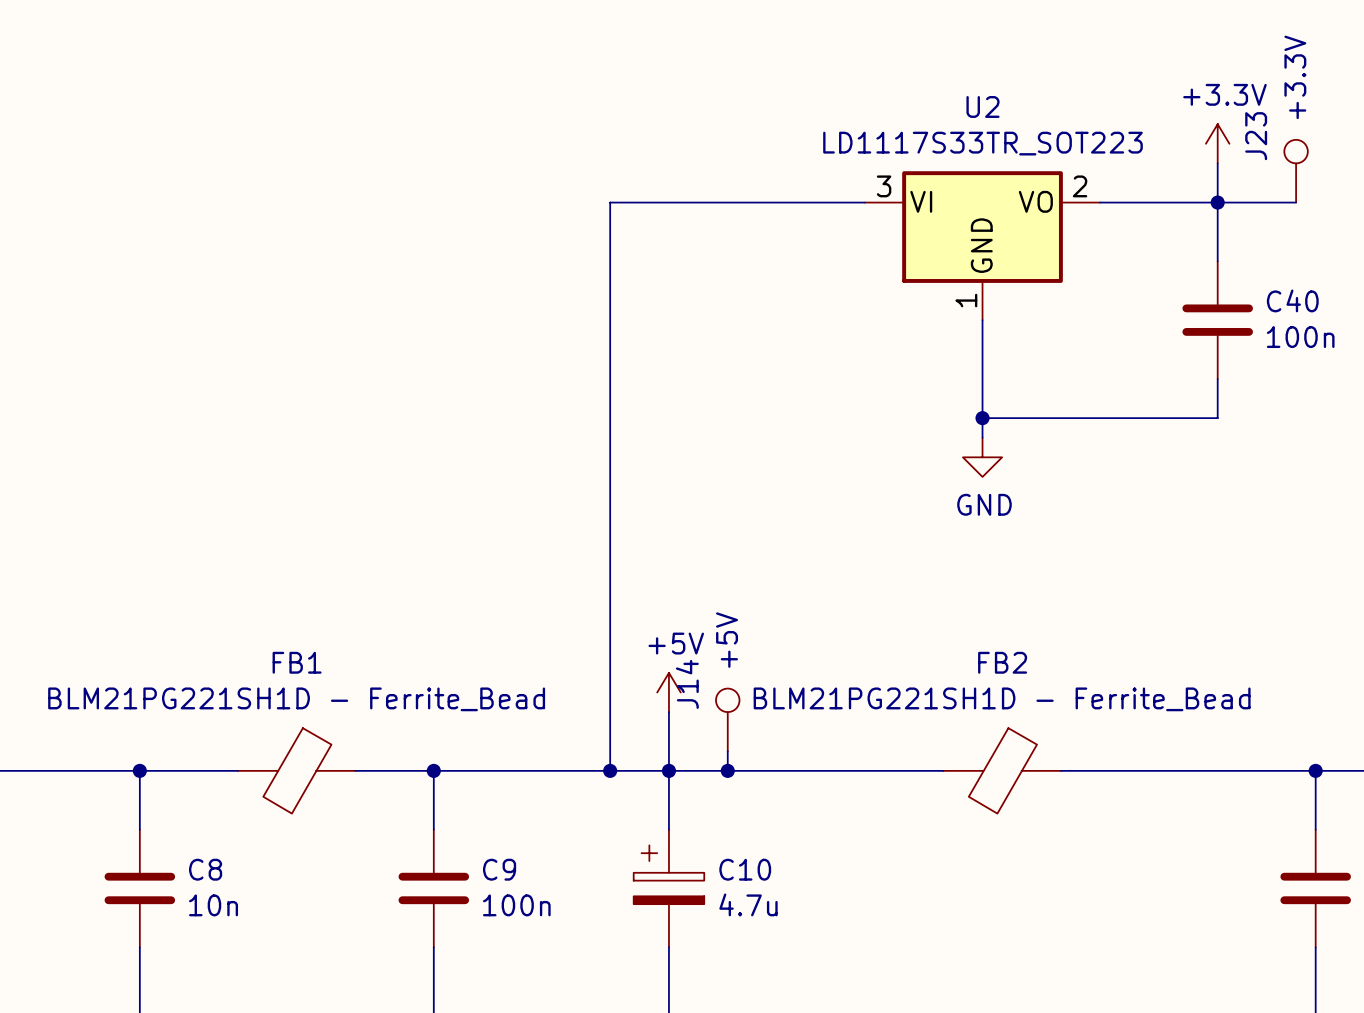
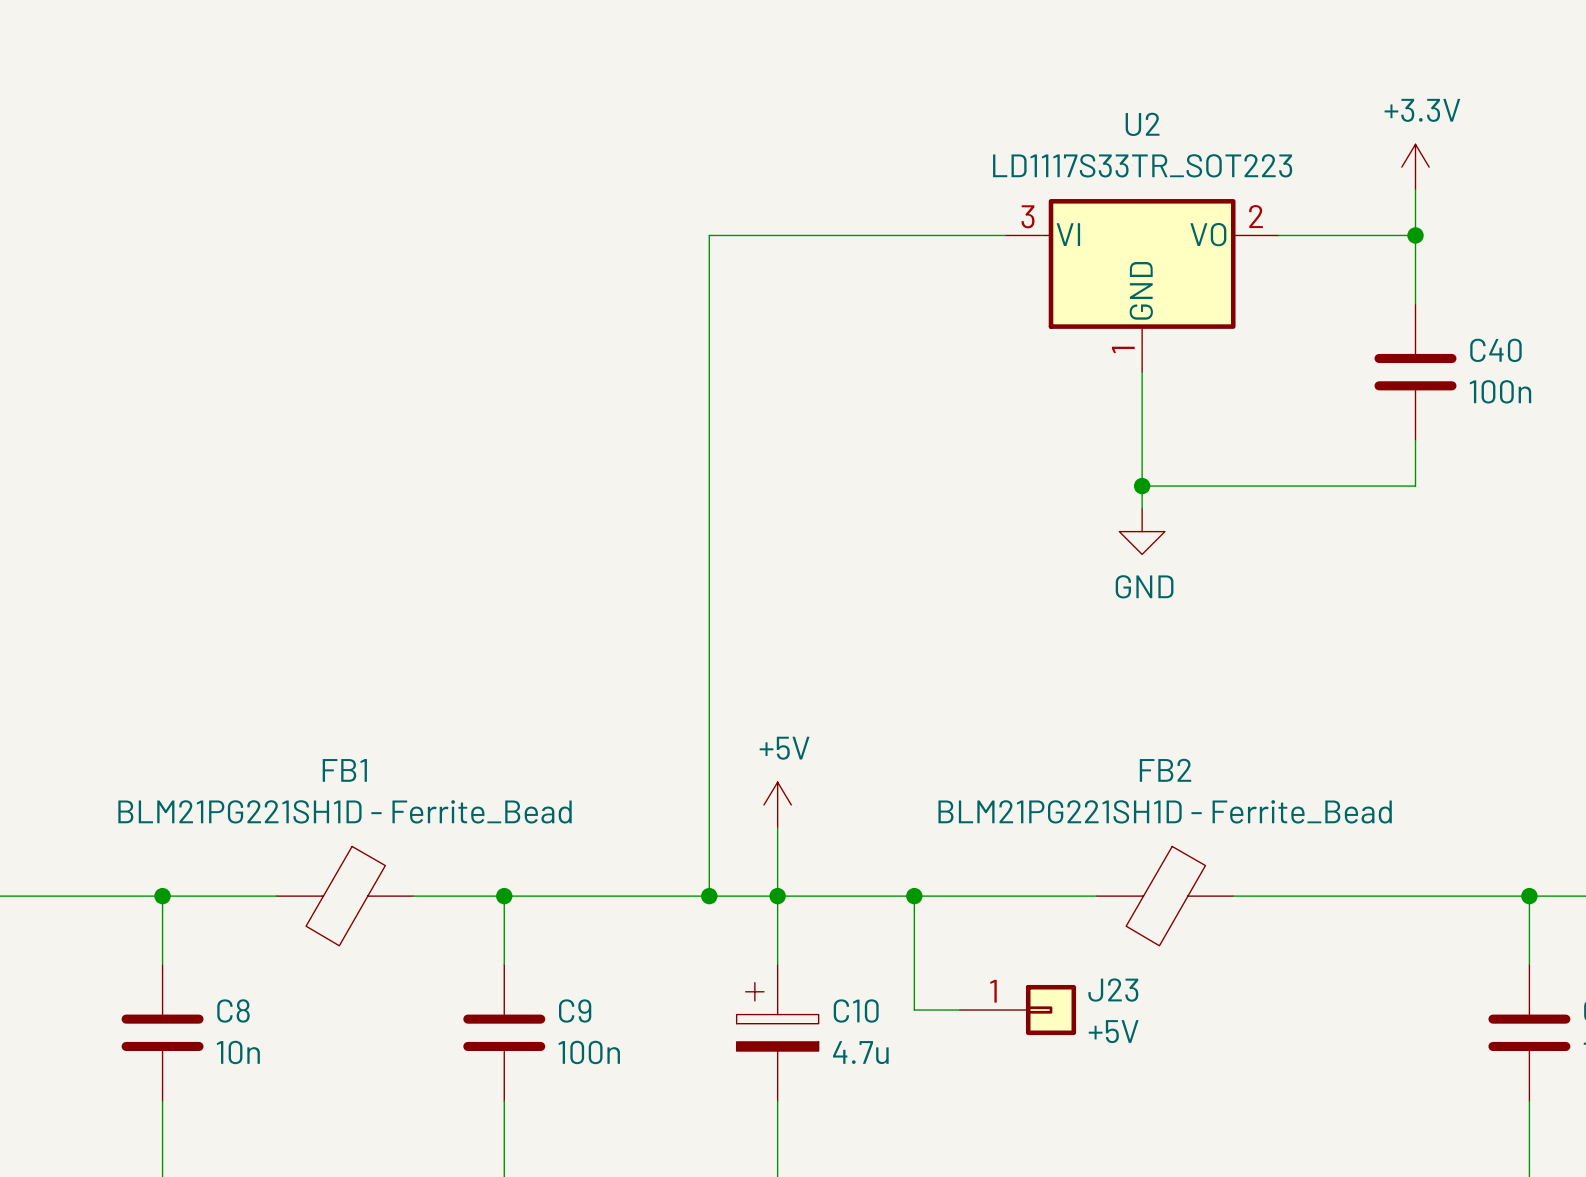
J23 value: +3.3V (1295, 77) -> +5V (1113, 1031)
J23 name position: J23 (1256, 136) -> J23 (1113, 990)
J23 symbol: [1284, 139, 1308, 203] -> [959, 984, 1077, 1036]
wire: (1217, 202) (1296, 202) -> none
J14: +5V (727, 719) -> none
wire: (727, 751) (727, 770) -> none
junction position: (727, 770) -> (914, 896)
wire: none -> (914, 896) (914, 1010) (959, 1010)

